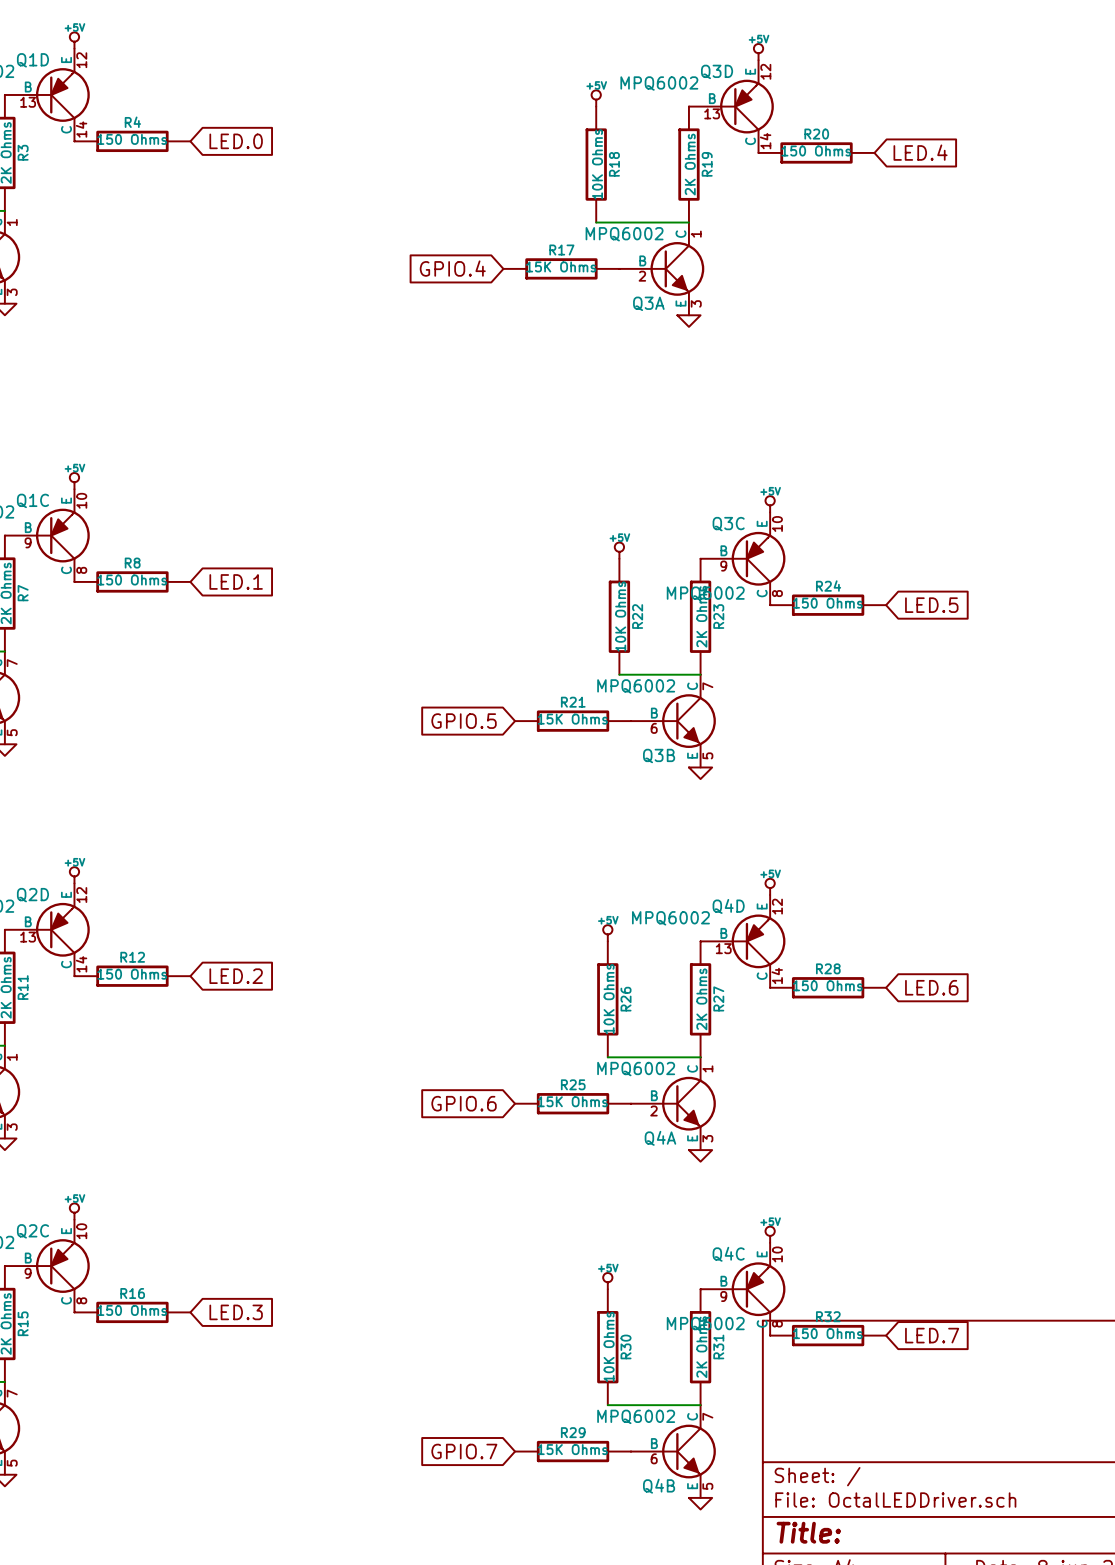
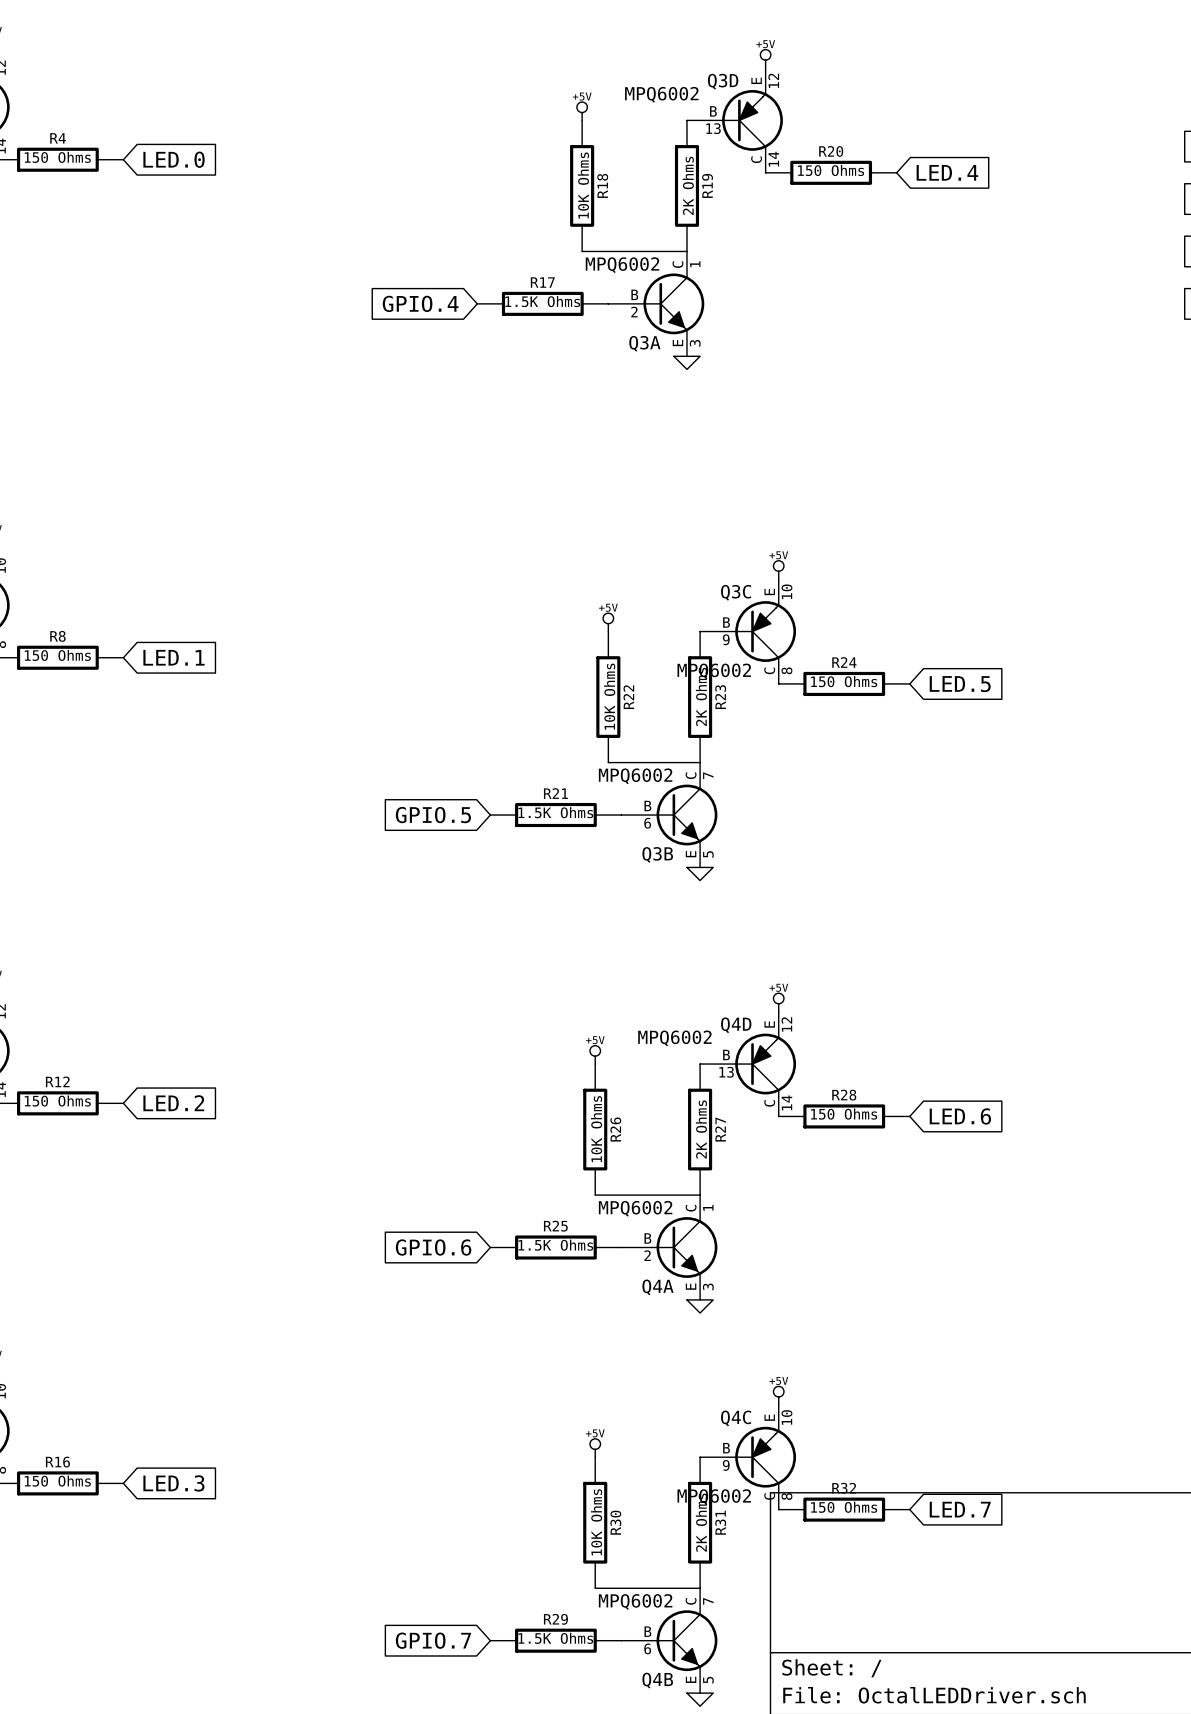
R17 value: 15K Ohms (561, 266) -> 1.5K Ohms (542, 301)
R21 value: 15K Ohms (572, 719) -> 1.5K Ohms (555, 812)
R25 value: 15K Ohms (572, 1101) -> 1.5K Ohms (555, 1245)
R29 value: 15K Ohms (572, 1449) -> 1.5K Ohms (555, 1638)

